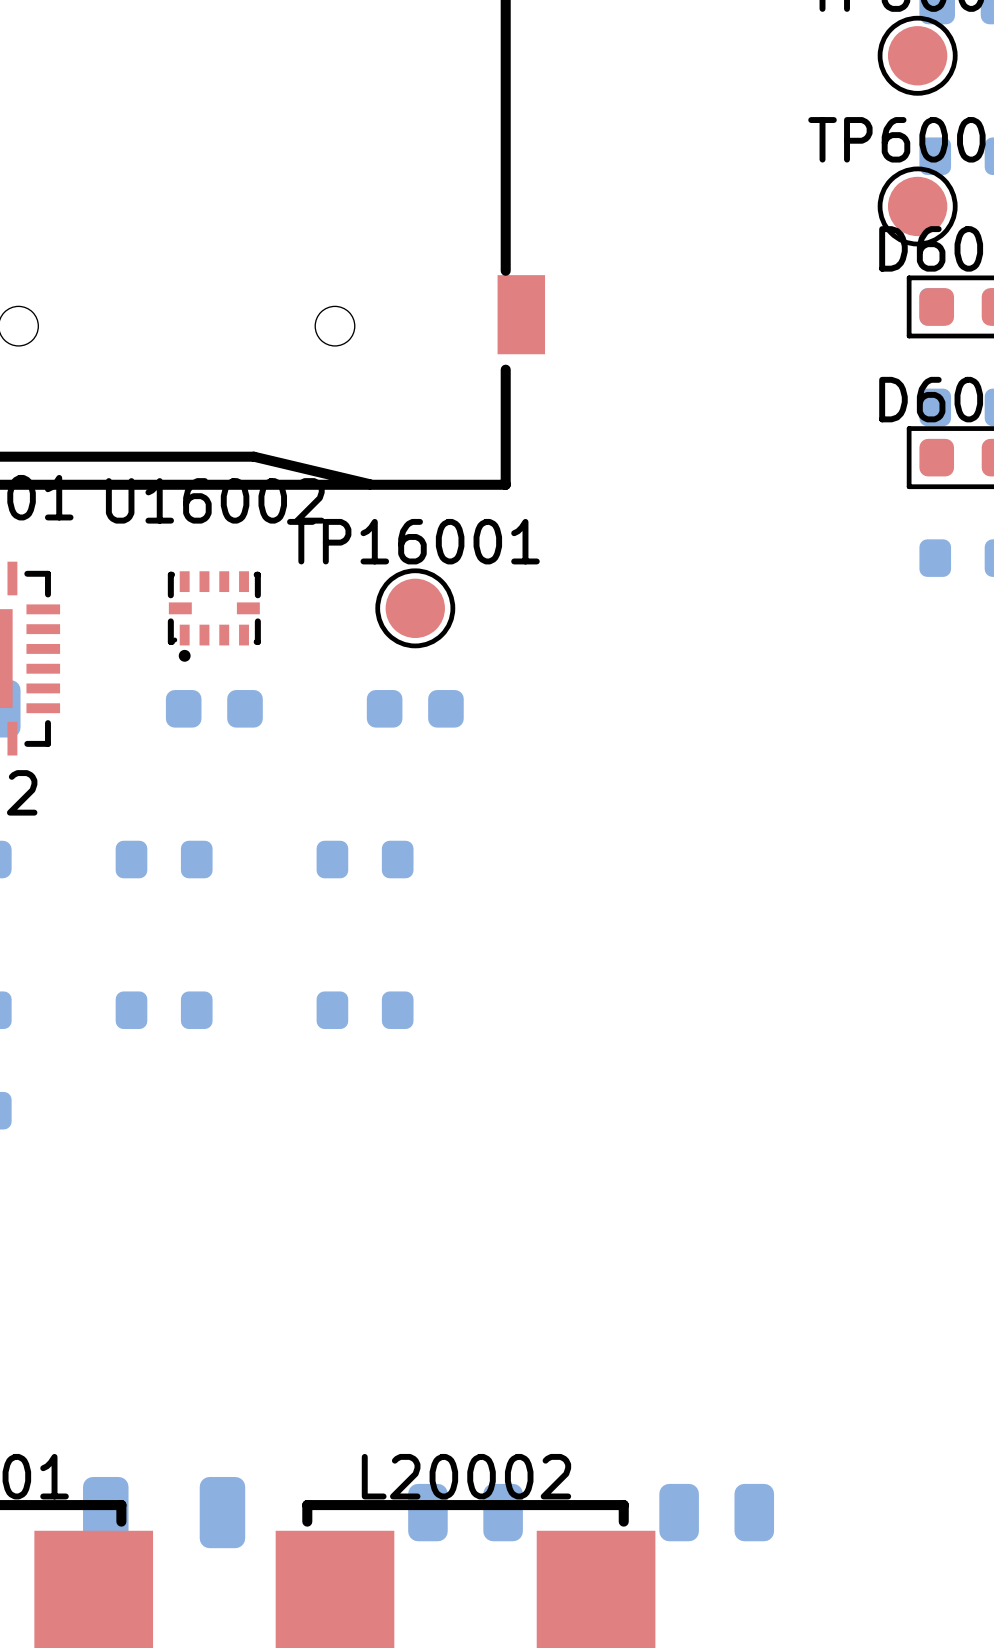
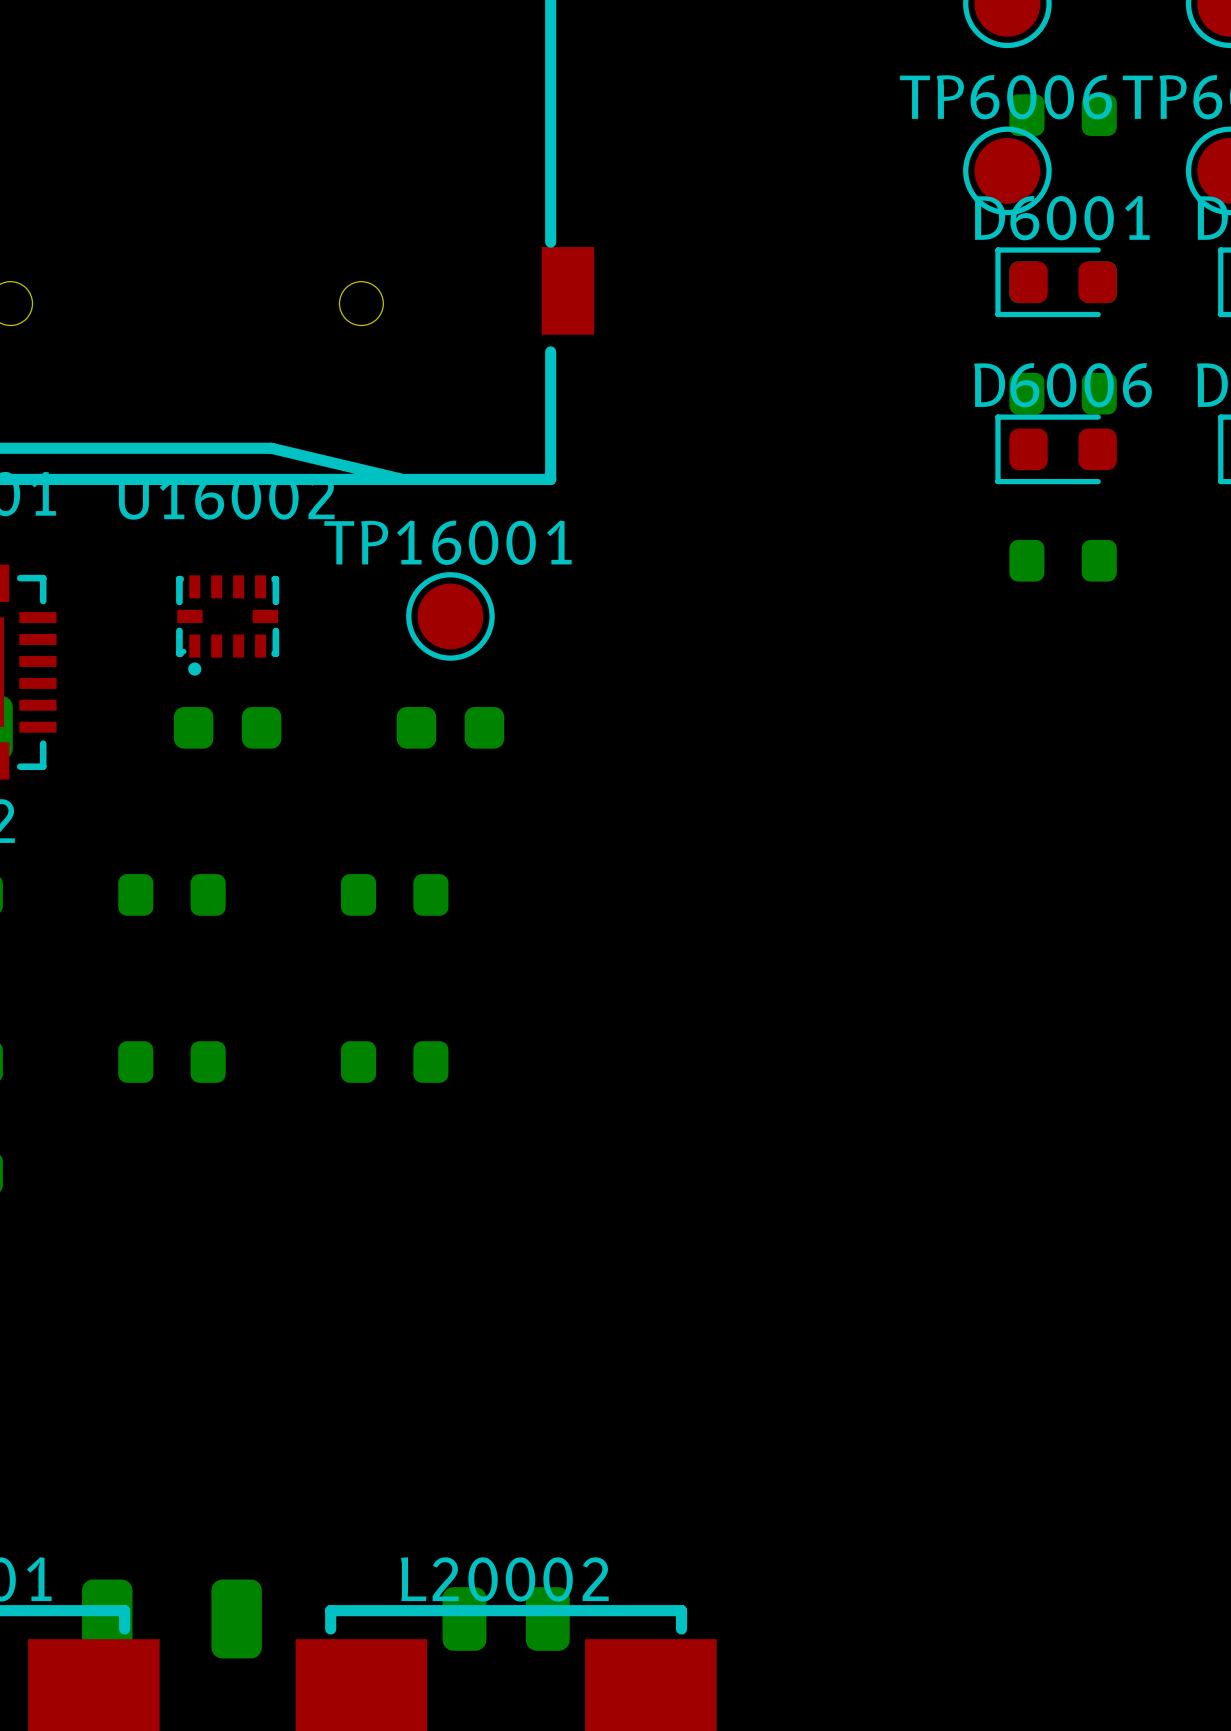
part: (716, 1512) -> none

